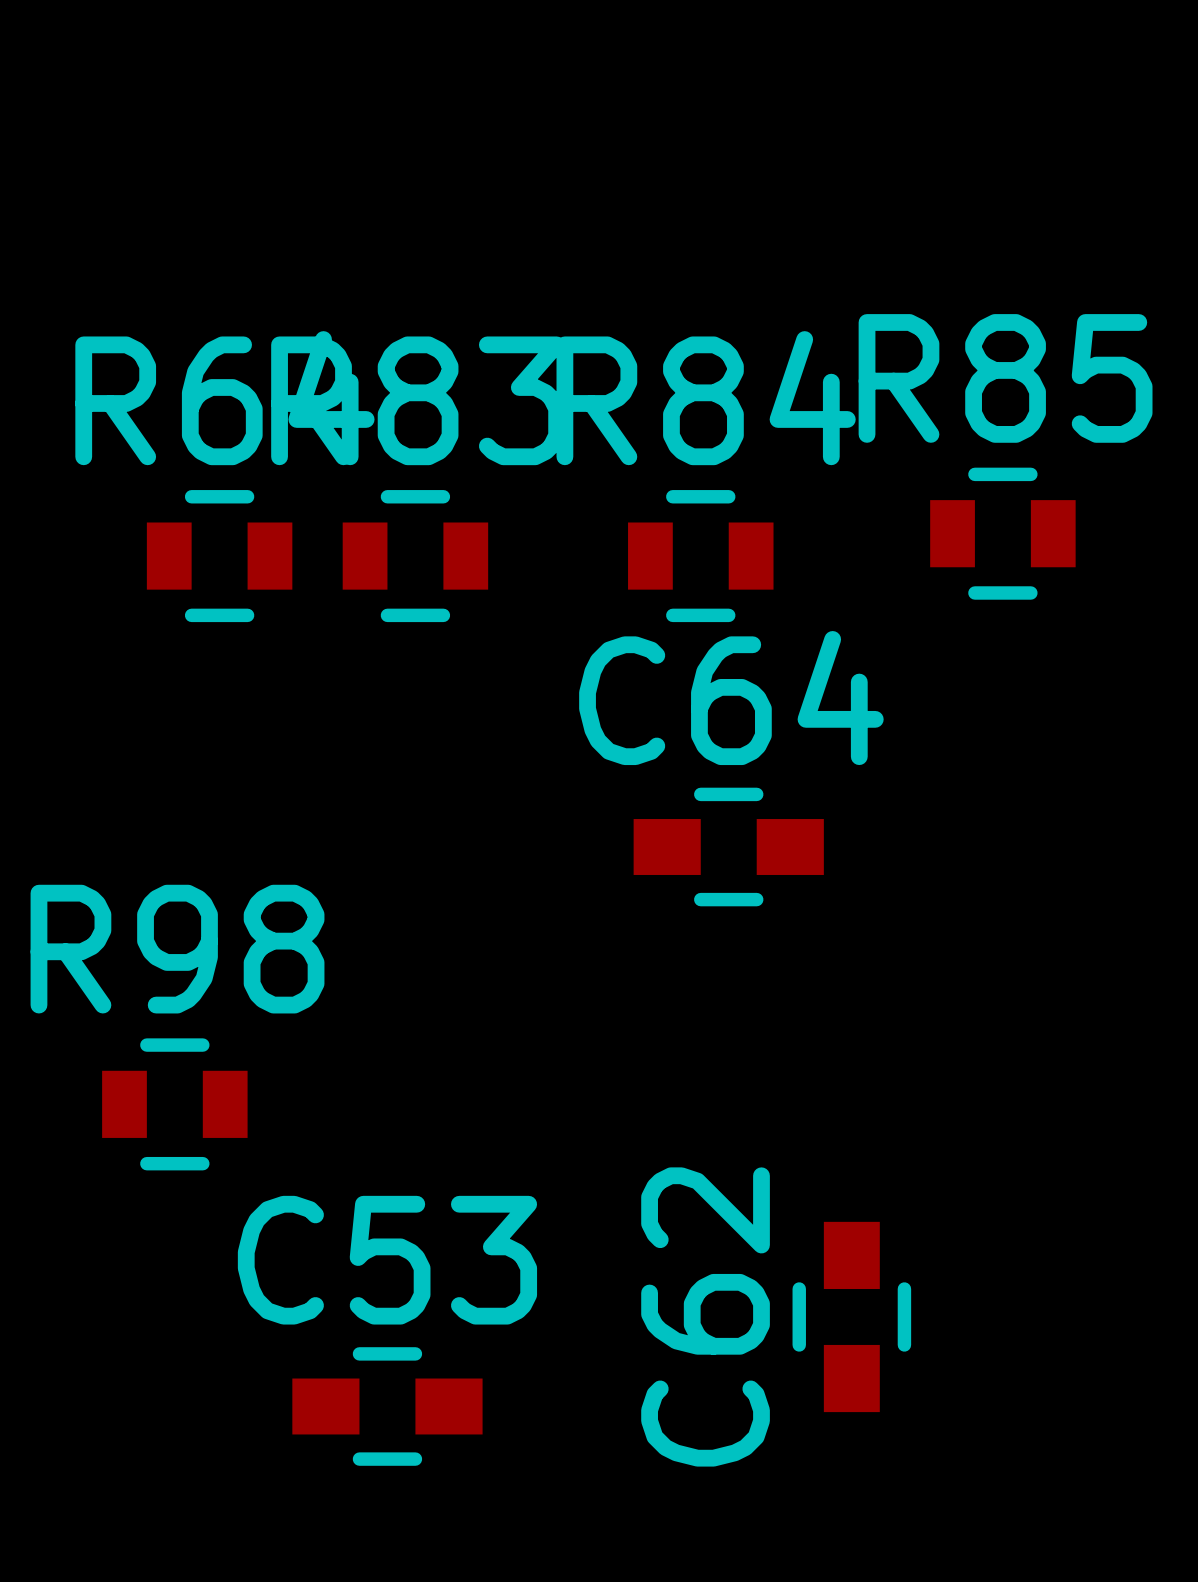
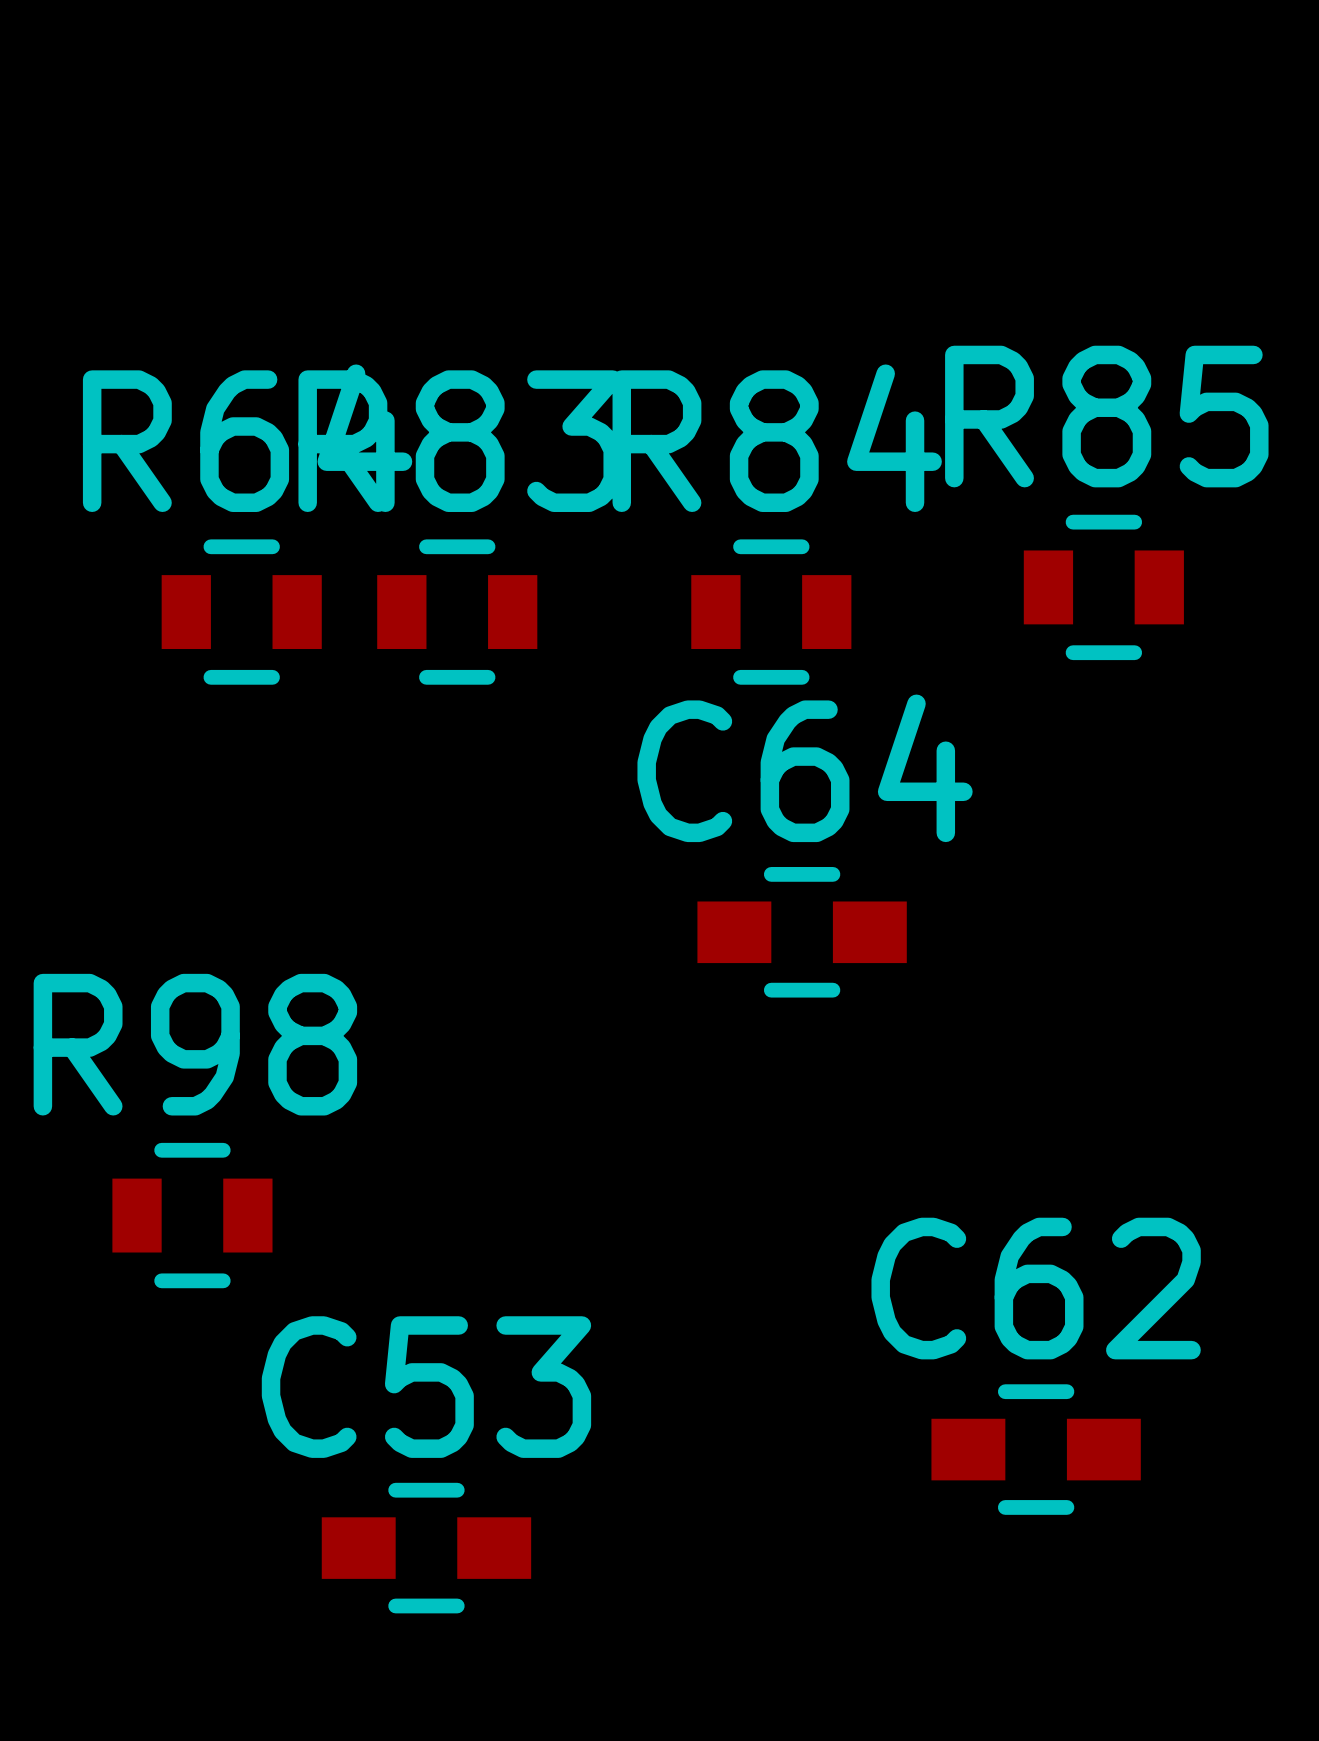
C62 rotation: 0° (851, 1316) -> 90° clockwise (1036, 1449)

